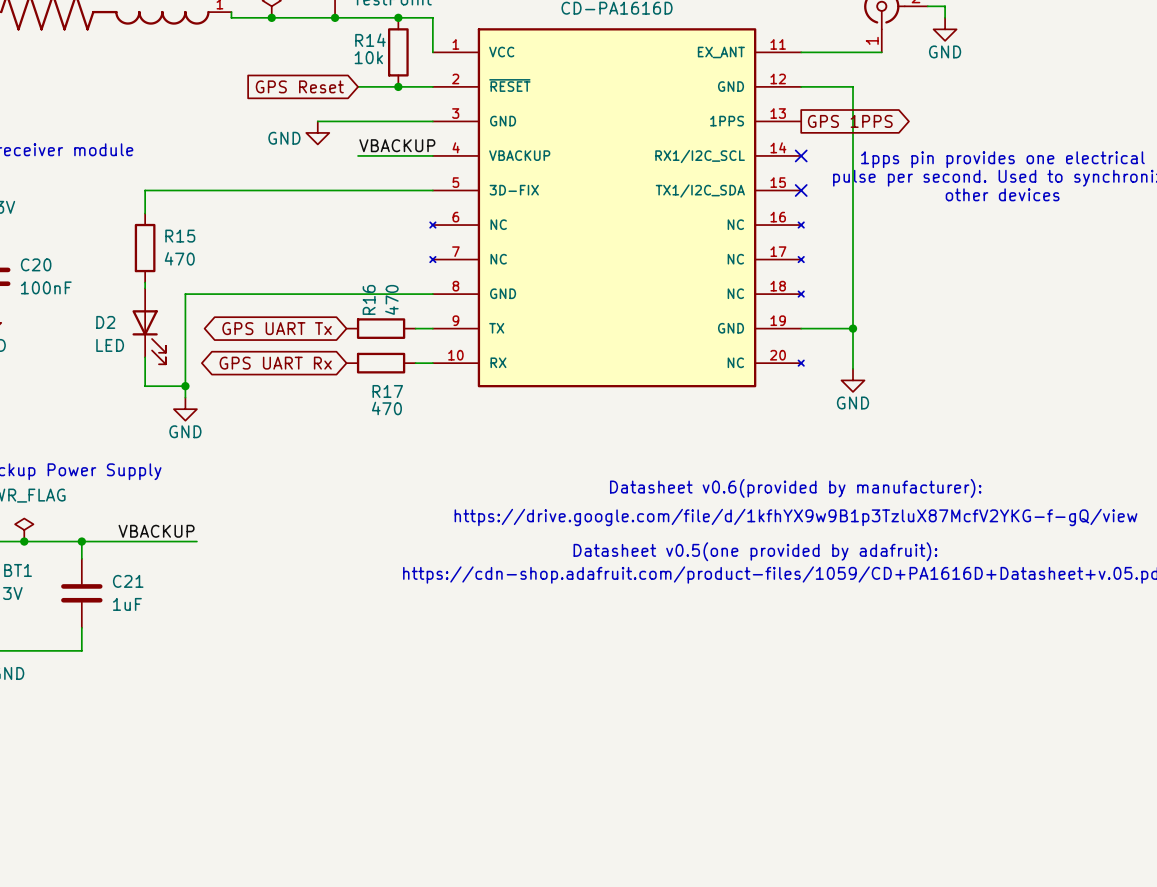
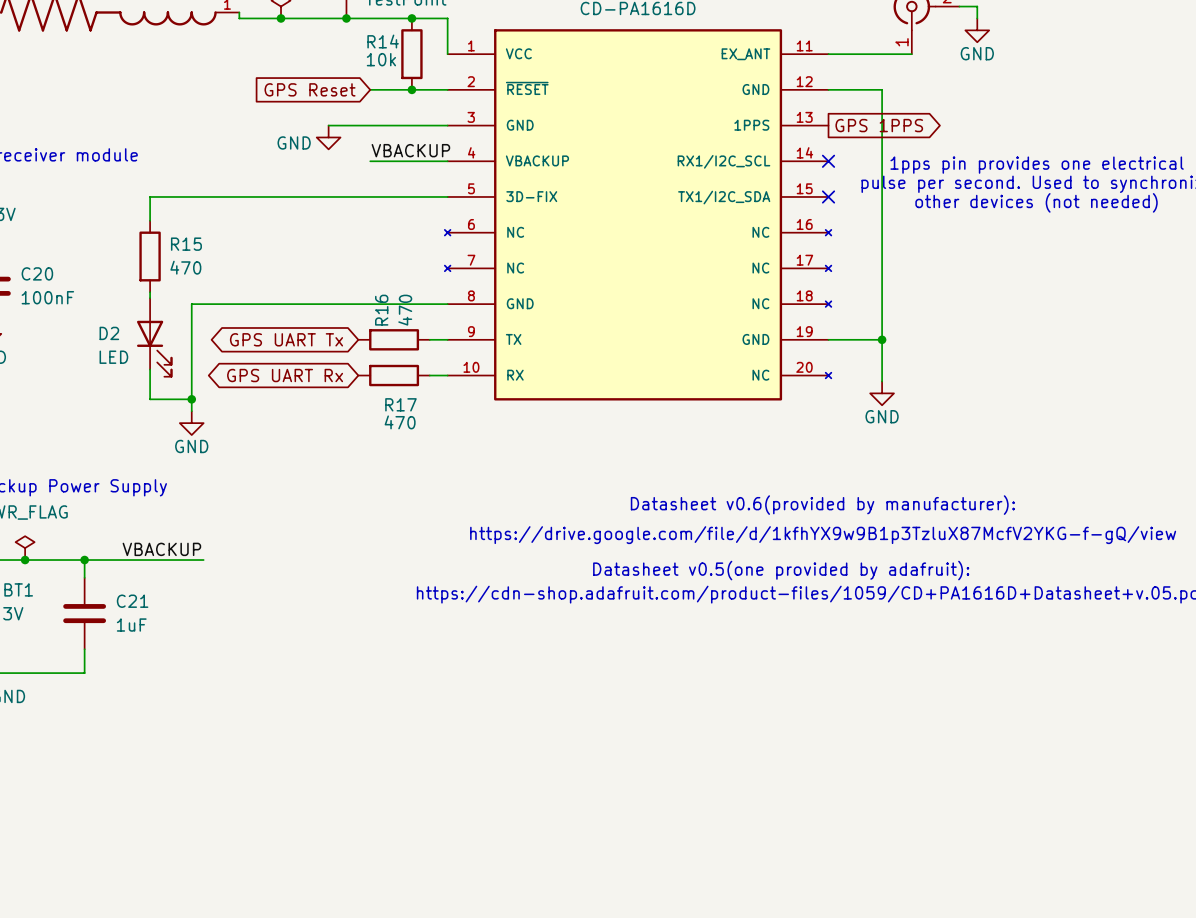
text: other devices (1002, 194) -> other devices (not needed) (1036, 202)

